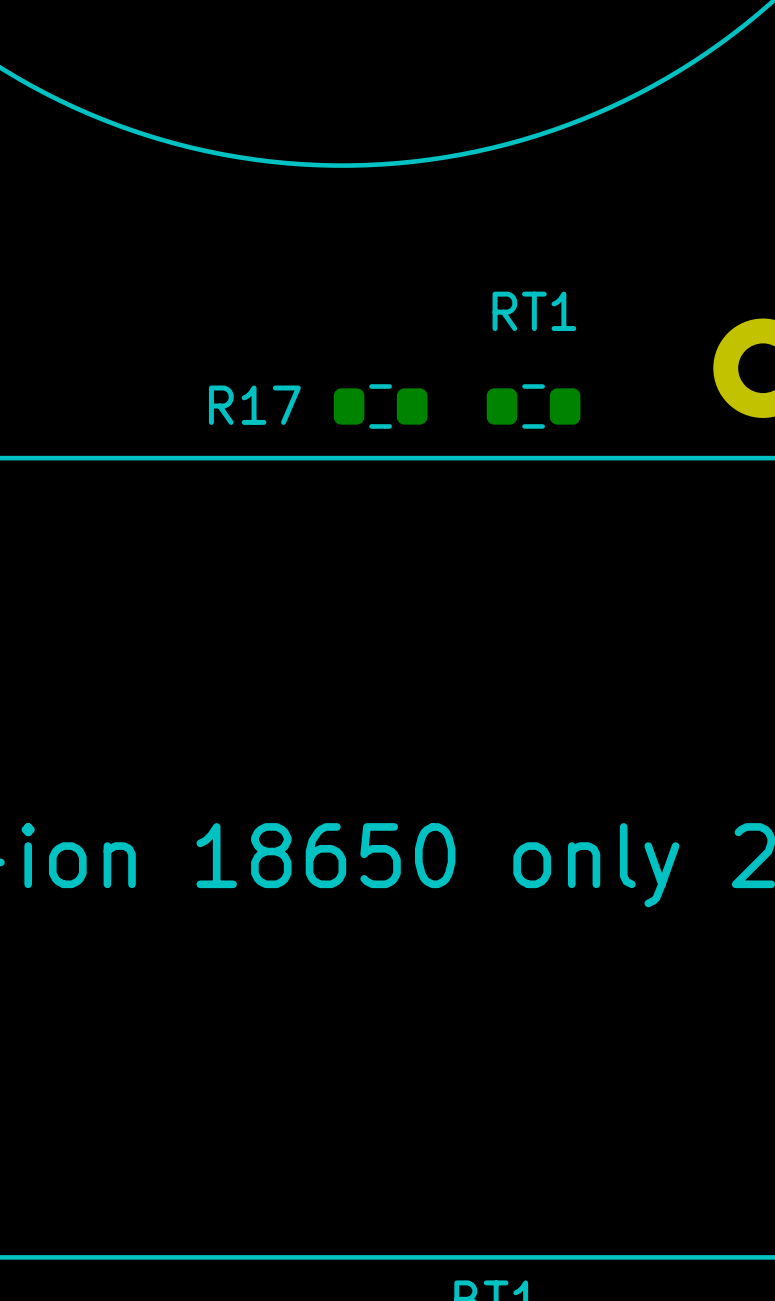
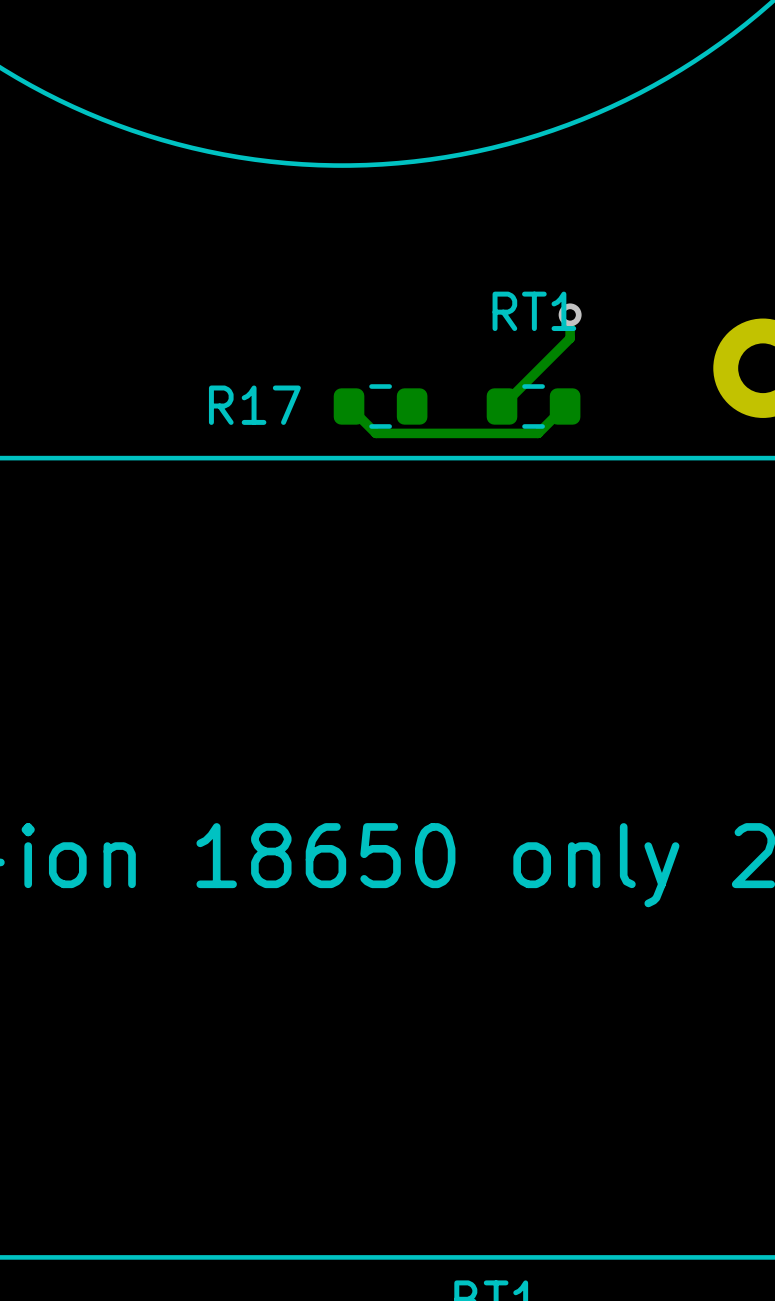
bottom track: none -> (570, 314) (570, 338) (502, 406)
via: none -> (570, 314)
bottom track: none -> (565, 406) (538, 433) (375, 433) (349, 406)

